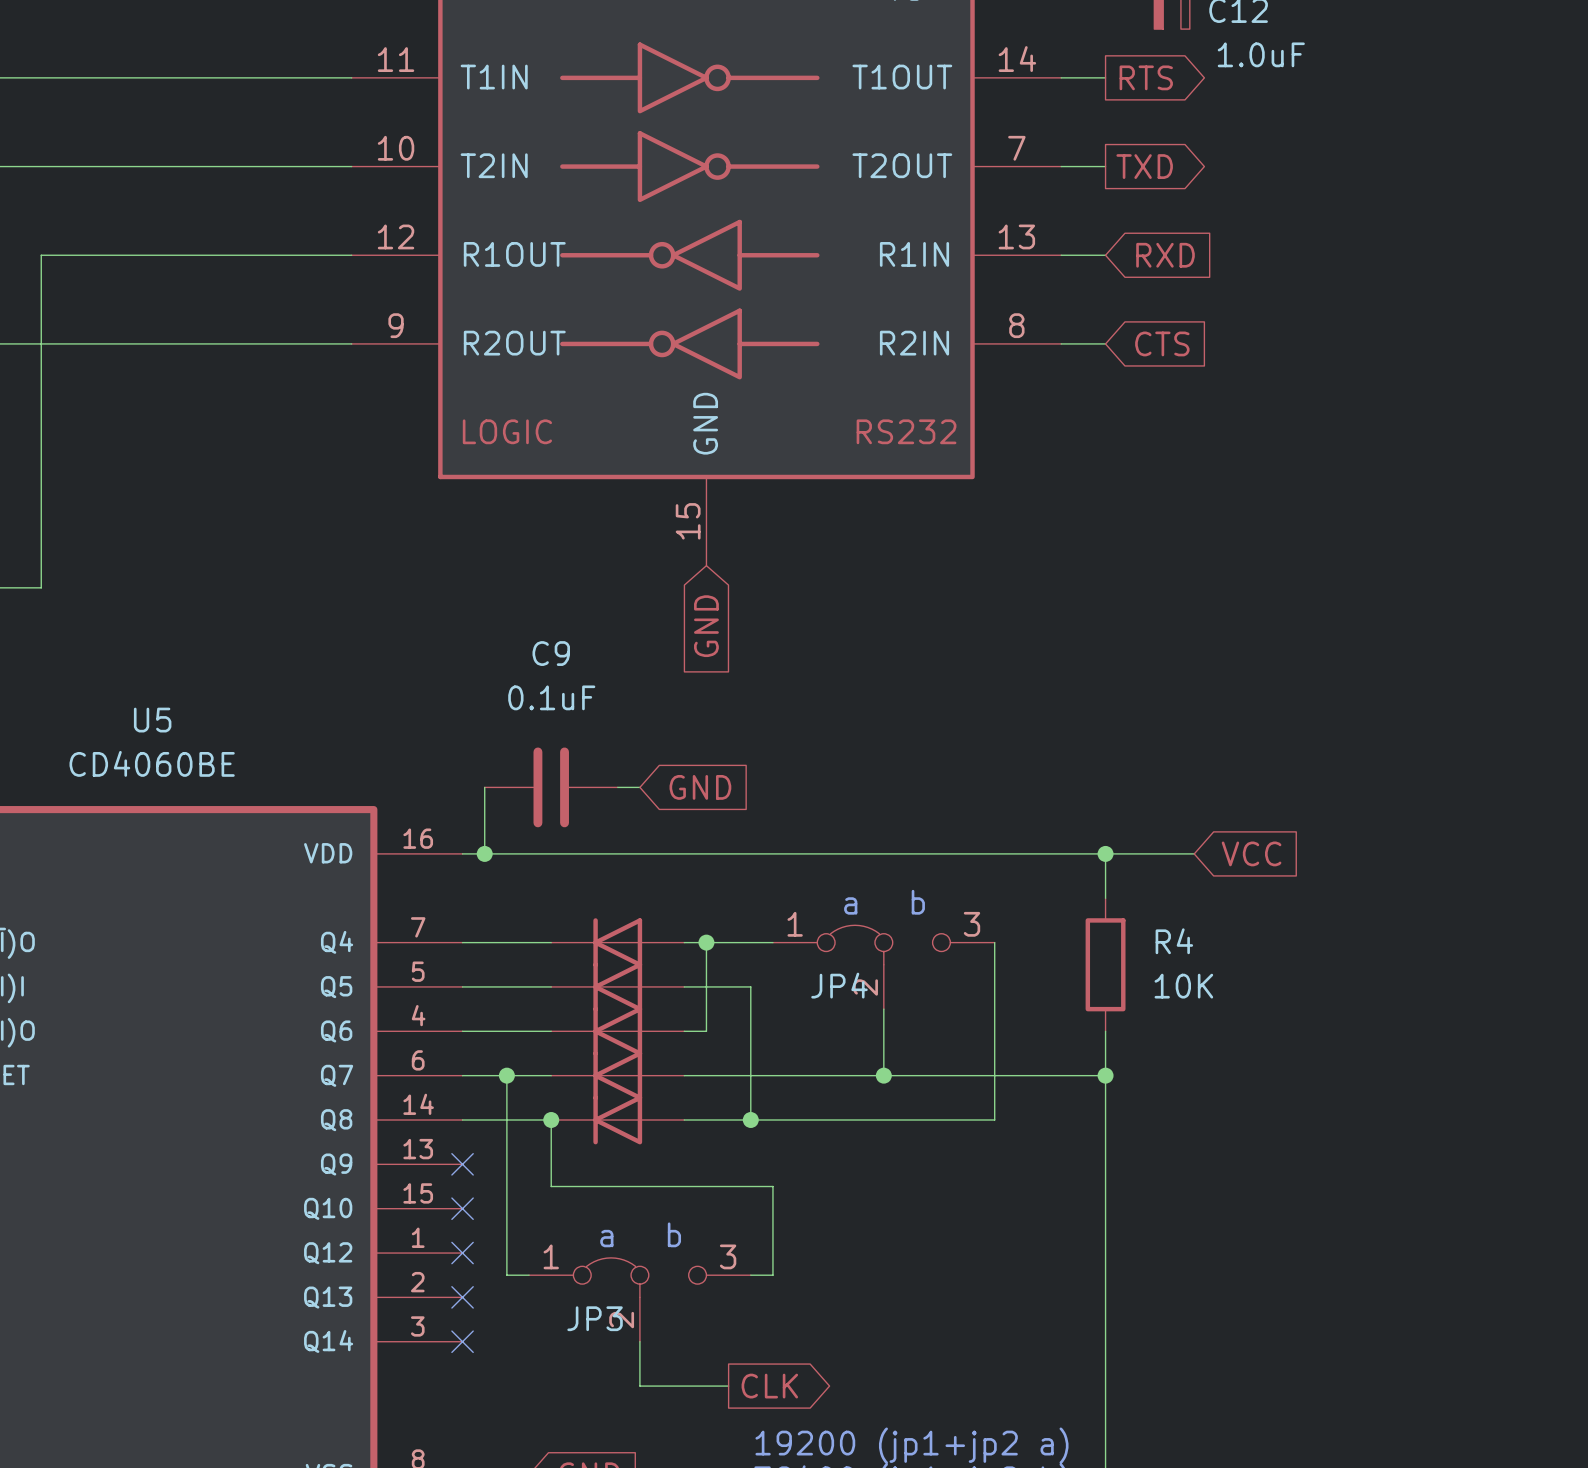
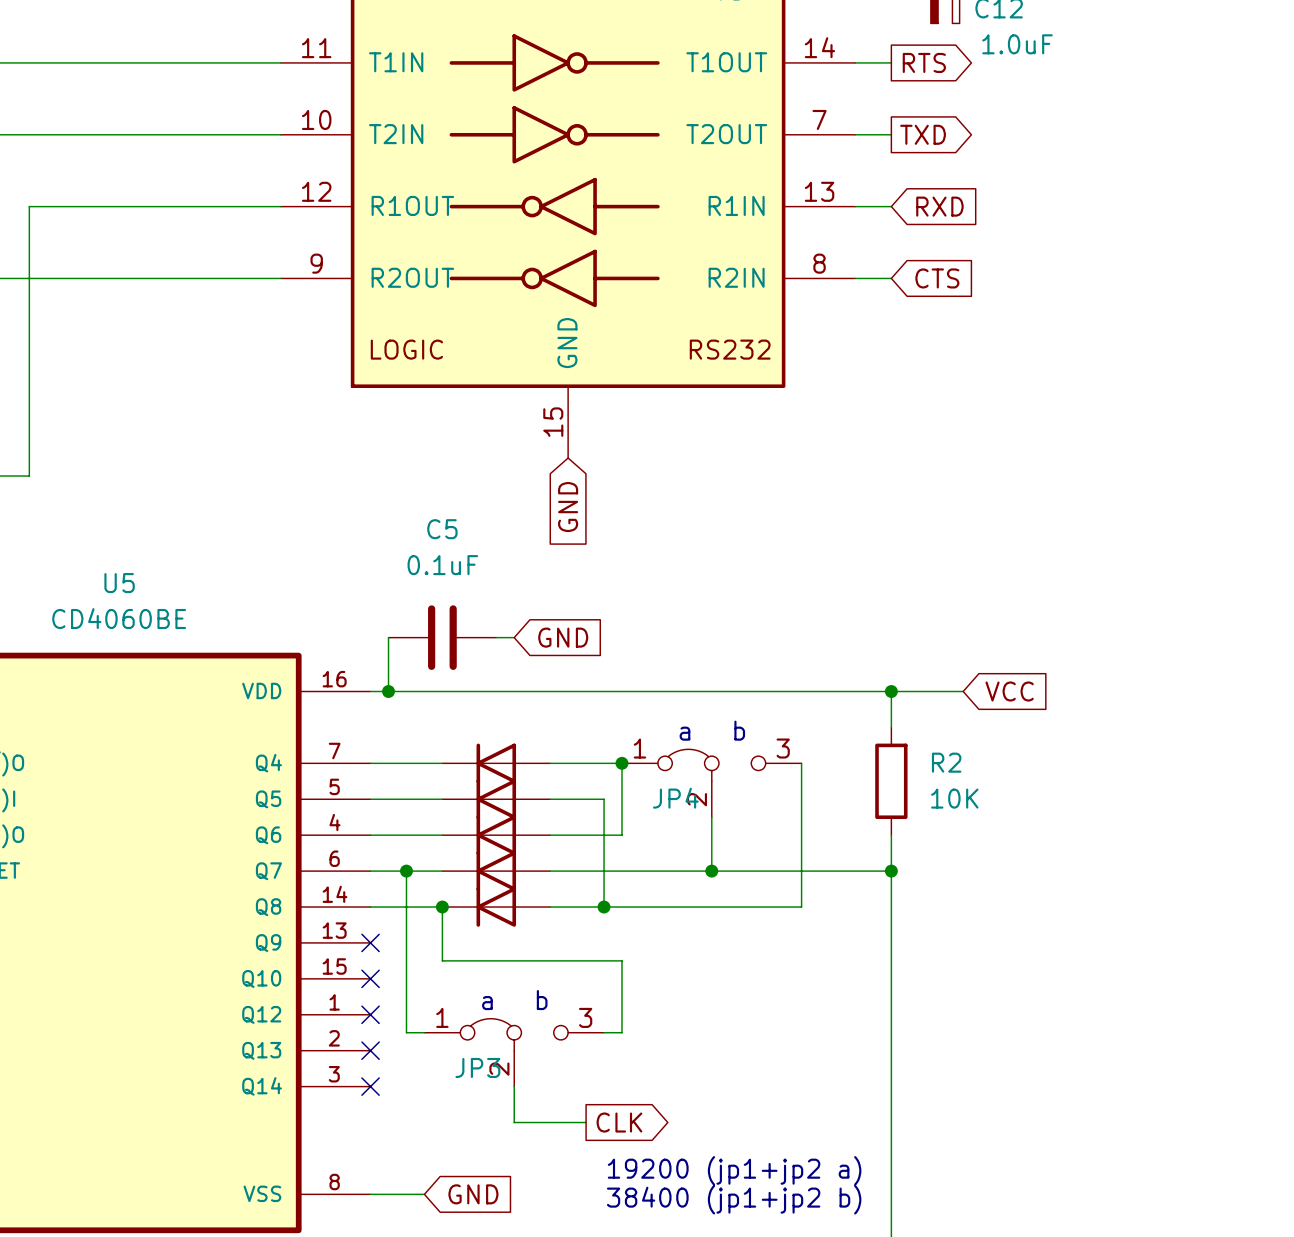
C9 name: C9 (551, 653) -> C5 (442, 529)
R4 name: R4 (1174, 941) -> R2 (946, 762)
wire: (706, 942) (706, 1031) -> (621, 763) (621, 835) (568, 835)
junction position: (706, 942) -> (621, 763)

